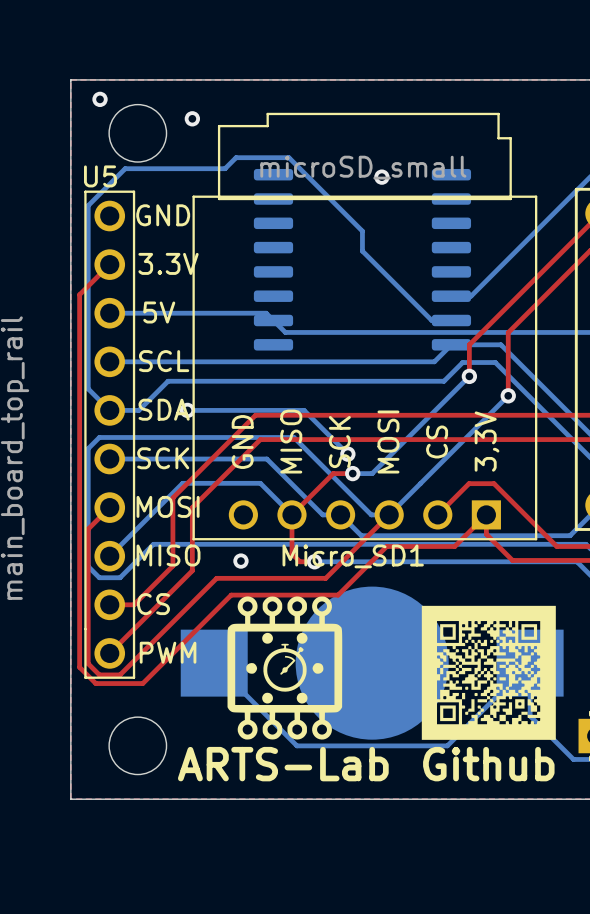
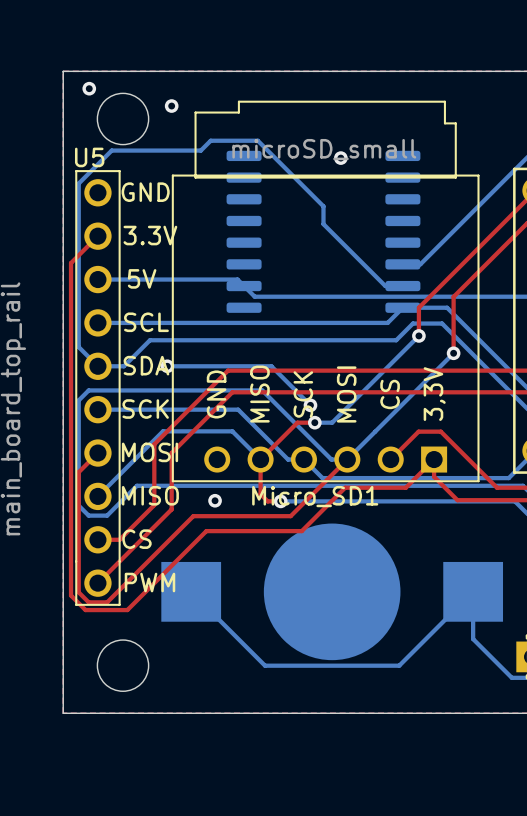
ARTS-Lab: (284, 667) -> none
Github: (488, 672) -> none

